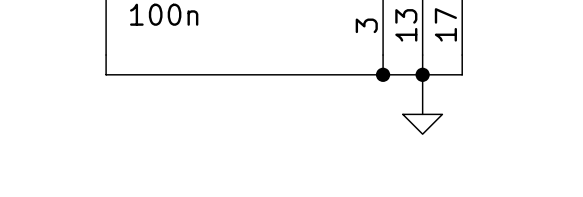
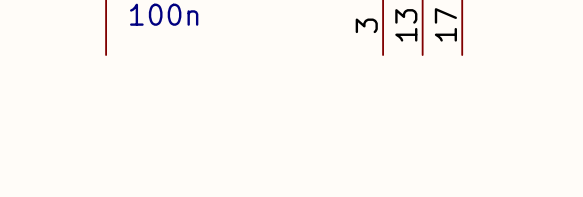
wire: (106, 55) (106, 74) (462, 74) (462, 55) -> none
wire: (383, 55) (383, 74) -> none
wire: (422, 55) (422, 114) -> none
junction: (383, 74) -> none
junction: (422, 74) -> none
power symbol: (422, 124) -> none

